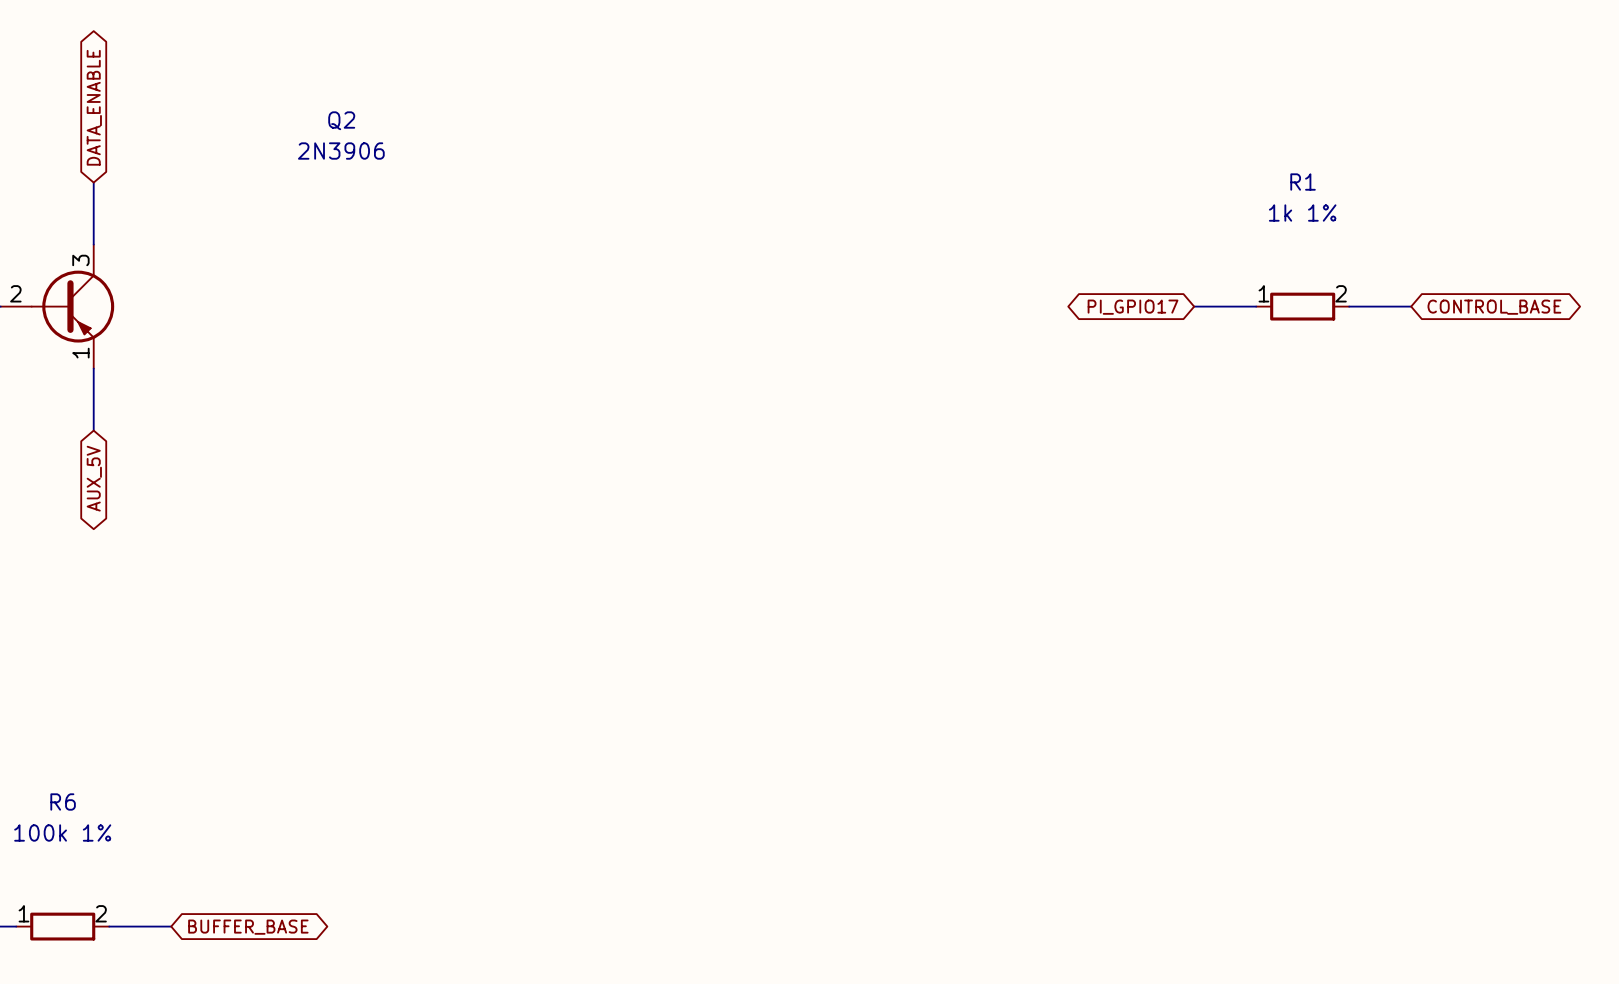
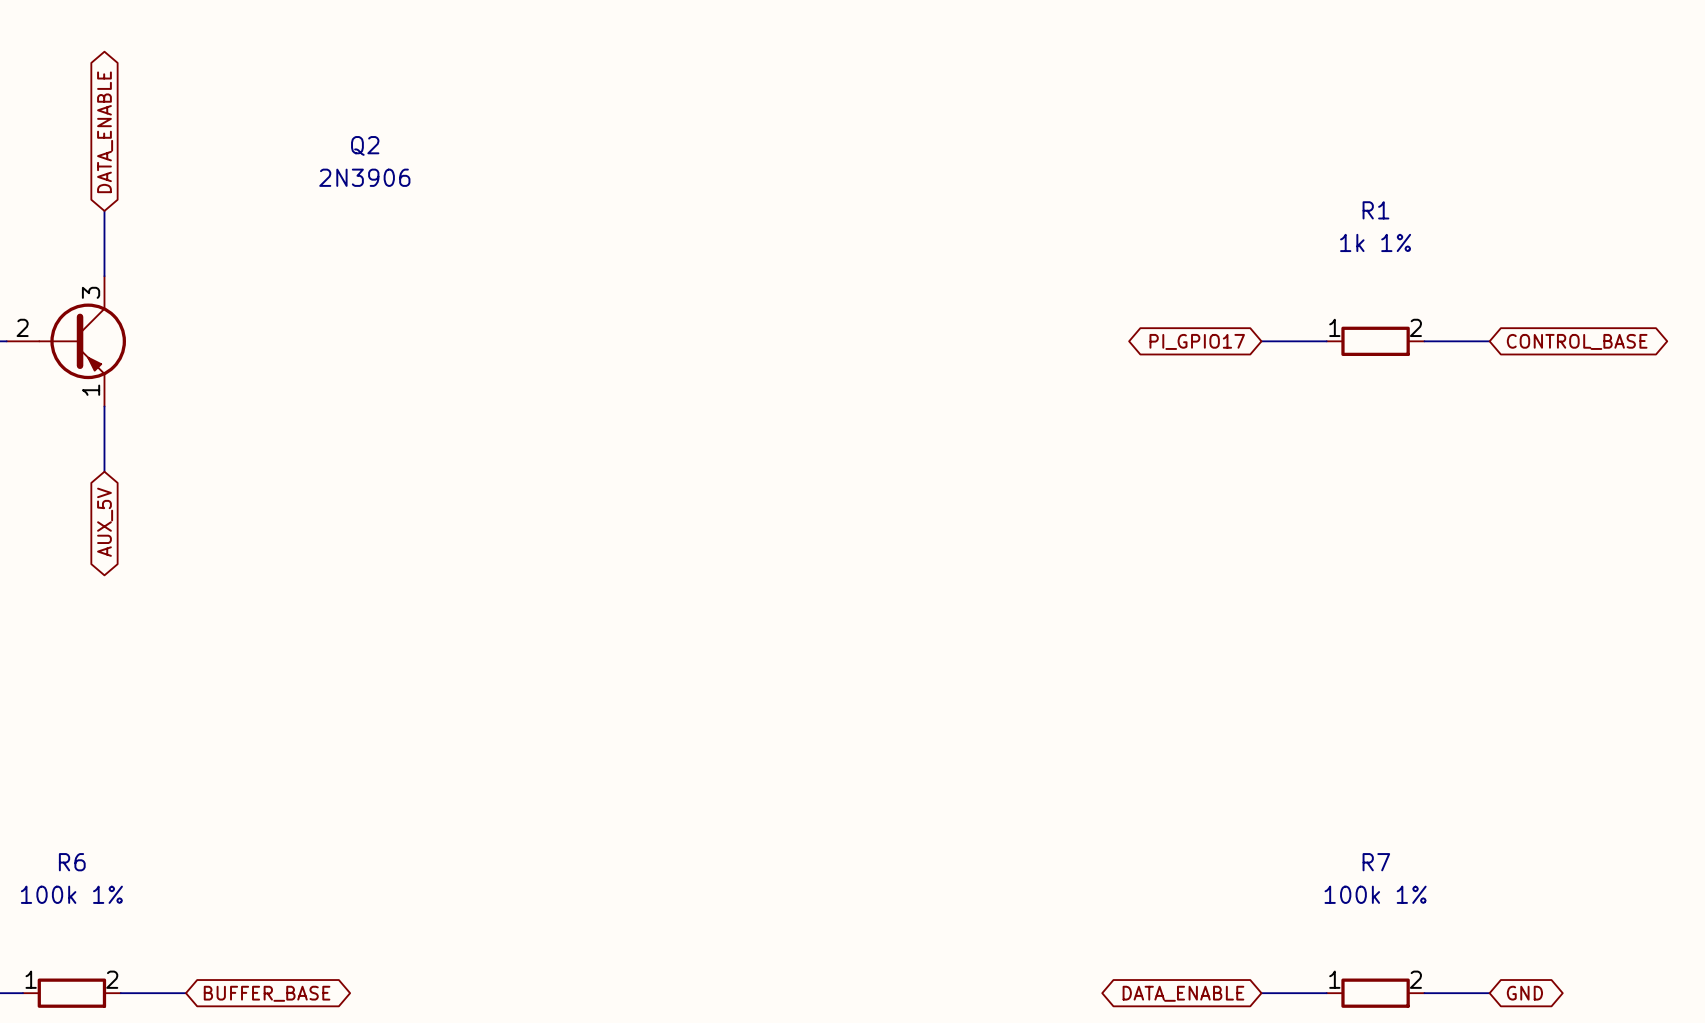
wire: none -> (1261, 993) (1326, 993)
R7: none -> 100k 1% (1375, 993)
wire: none -> (1424, 993) (1489, 993)
global label: none -> GND (1524, 993)
global label: none -> DATA_ENABLE (1183, 993)

